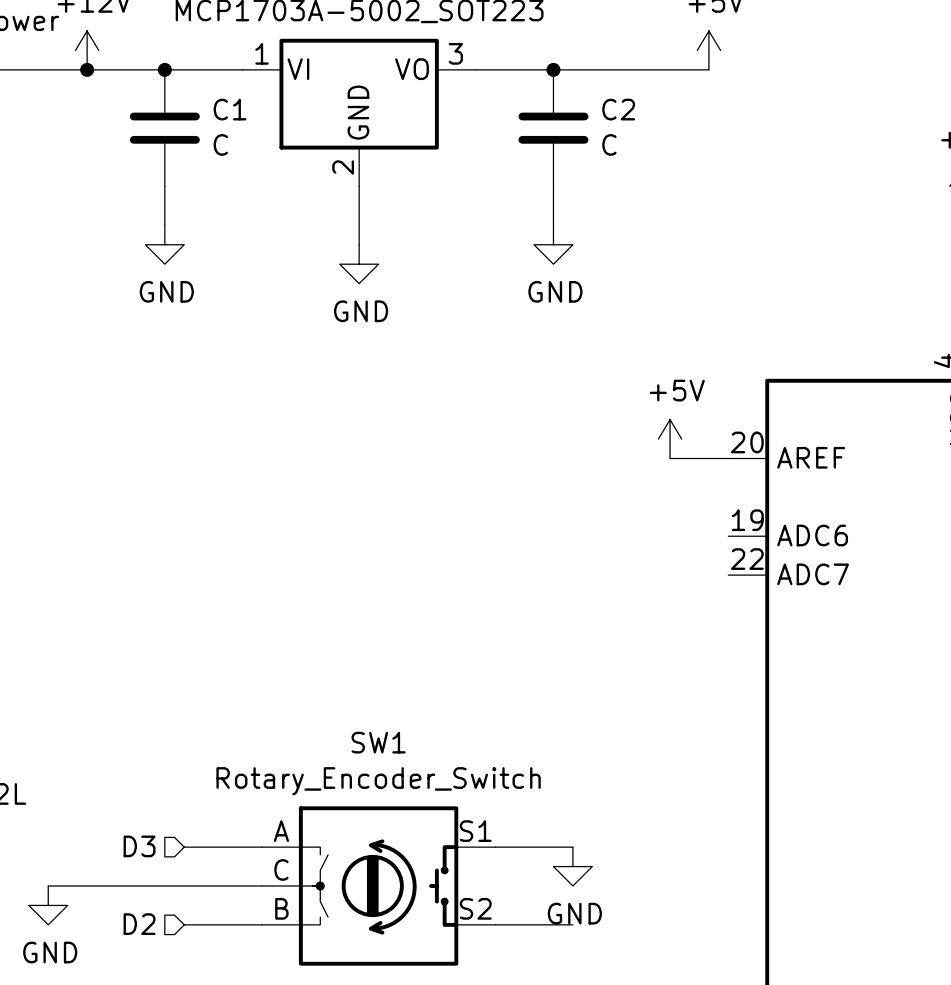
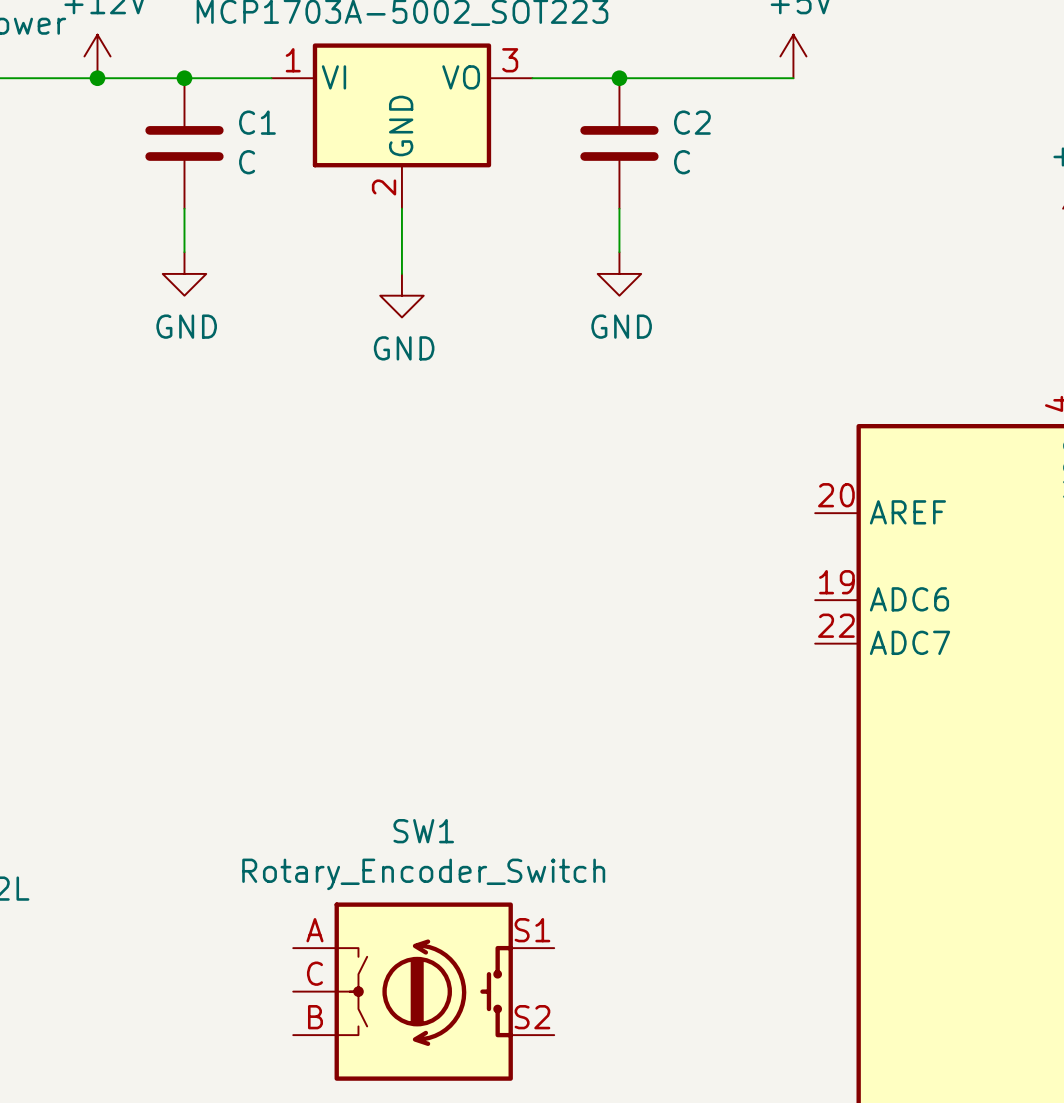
power symbol: +5V (670, 439) -> none
wire: (670, 458) (728, 458) -> none
hierarchical label: D3 (139, 846) -> none
wire: (184, 847) (261, 847) -> none
wire: (495, 847) (572, 847) -> none
power symbol: GND (572, 866) -> none
wire: (48, 886) (261, 886) -> none
power symbol: GND (48, 905) -> none
hierarchical label: D2 (139, 924) -> none
wire: (184, 924) (261, 924) -> none
wire: (495, 924) (572, 924) -> none

